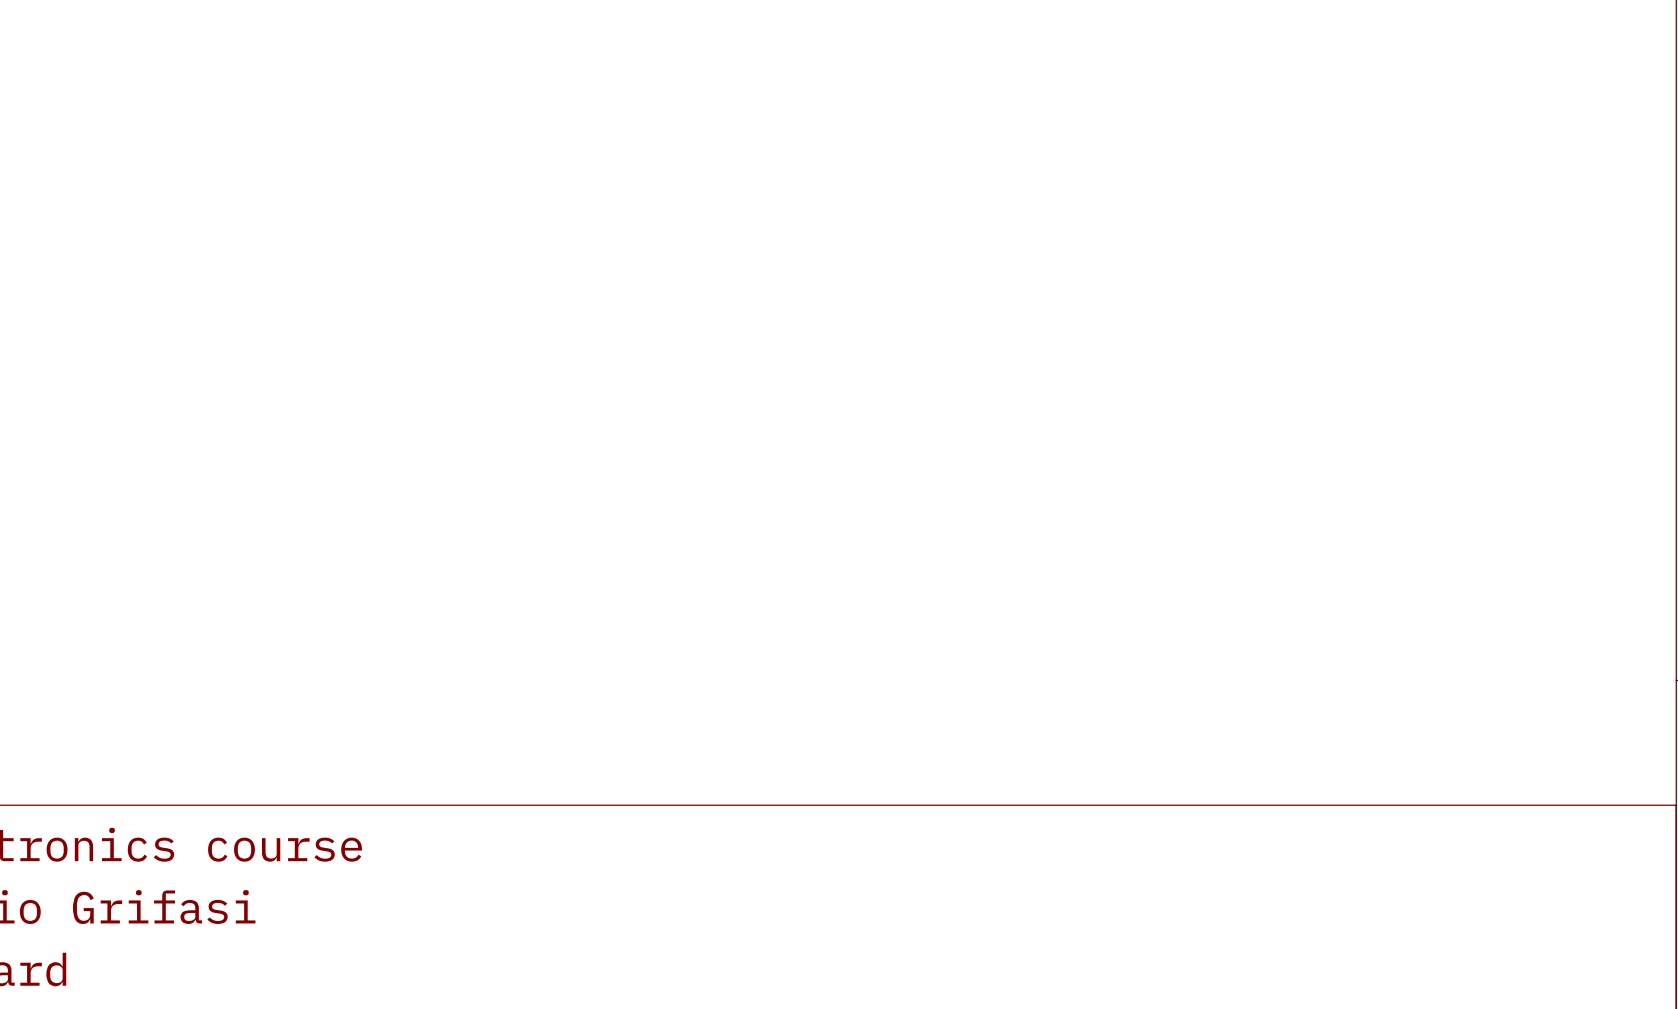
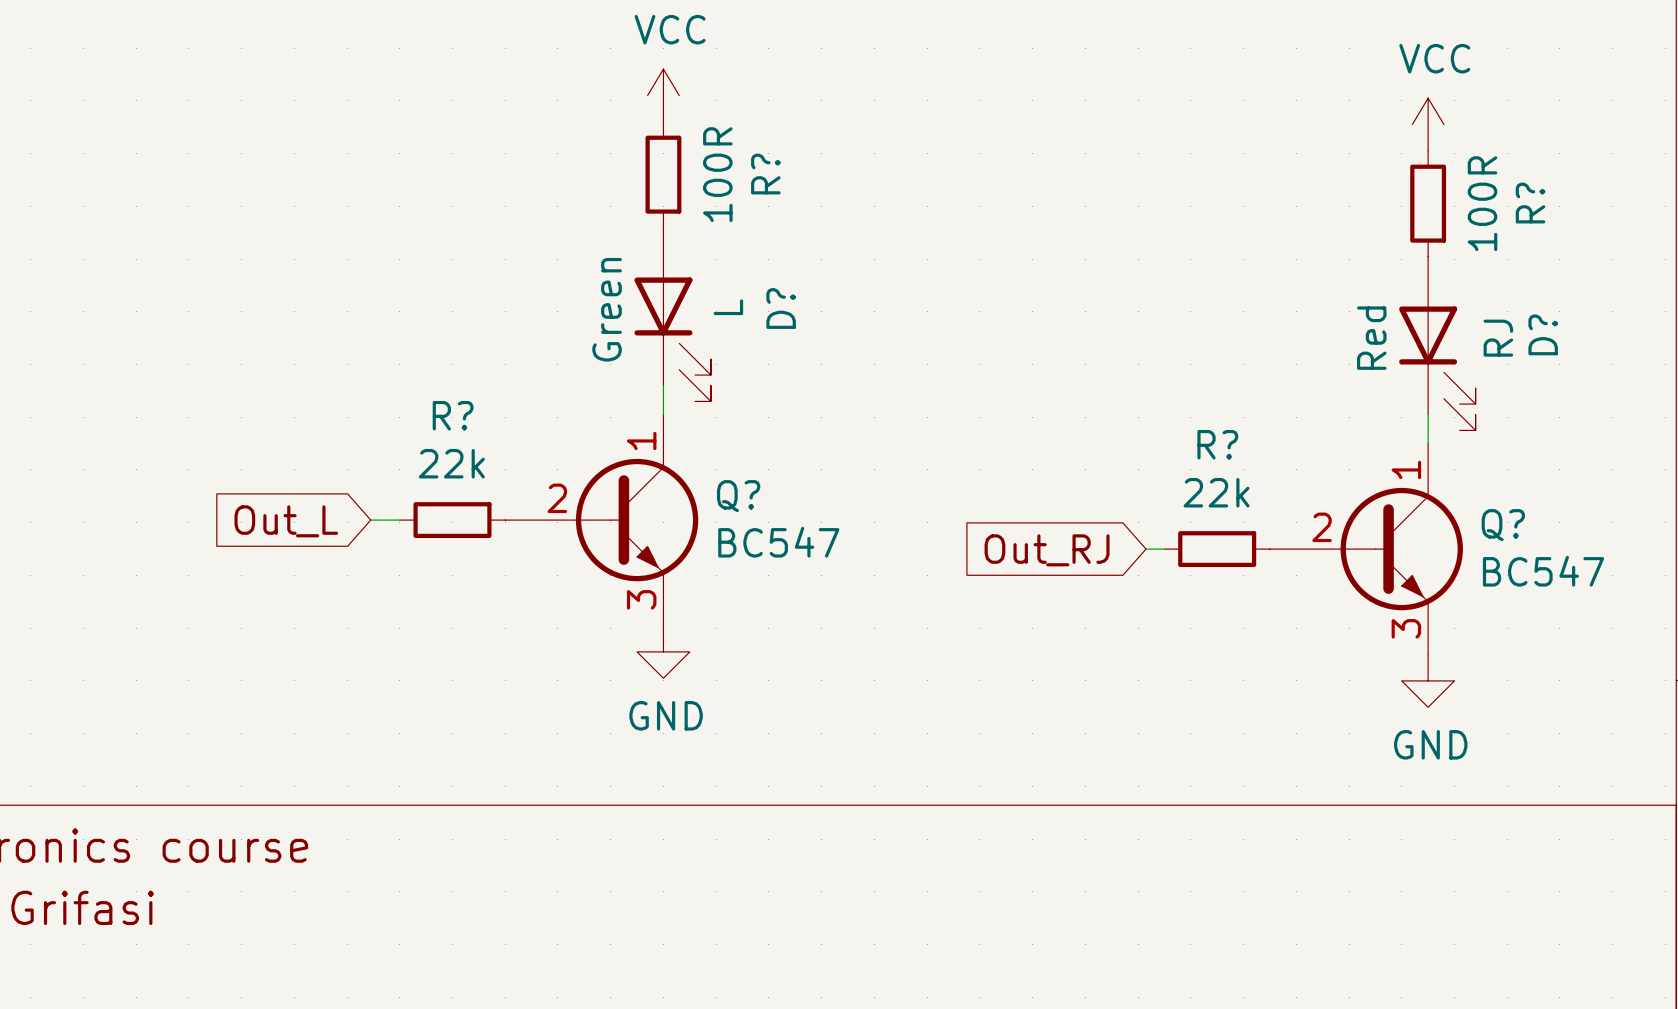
power symbol: none -> VCC (663, 95)
power symbol: none -> VCC (1428, 124)
R?: none -> 100R (663, 174)
R?: none -> 100R (1428, 203)
D?: none -> L (672, 314)
D?: none -> RJ (1437, 343)
wire: none -> (663, 385) (663, 414)
wire: none -> (1428, 414) (1428, 443)
wire: none -> (370, 520) (399, 520)
R?: none -> 22k (452, 520)
Q?: none -> BC547 (601, 520)
global label: none -> Out_L (286, 521)
wire: none -> (1145, 549) (1164, 549)
R?: none -> 22k (1217, 549)
Q?: none -> BC547 (1366, 549)
global label: none -> Out_RJ (1047, 550)
power symbol: none -> GND (663, 651)
power symbol: none -> GND (1428, 680)

